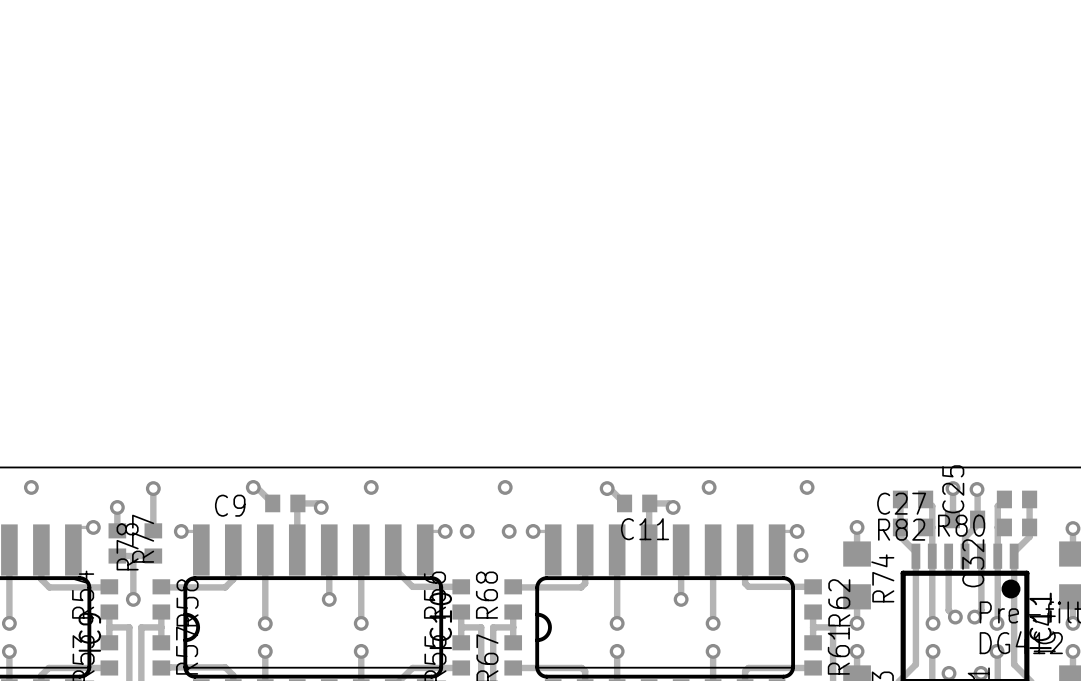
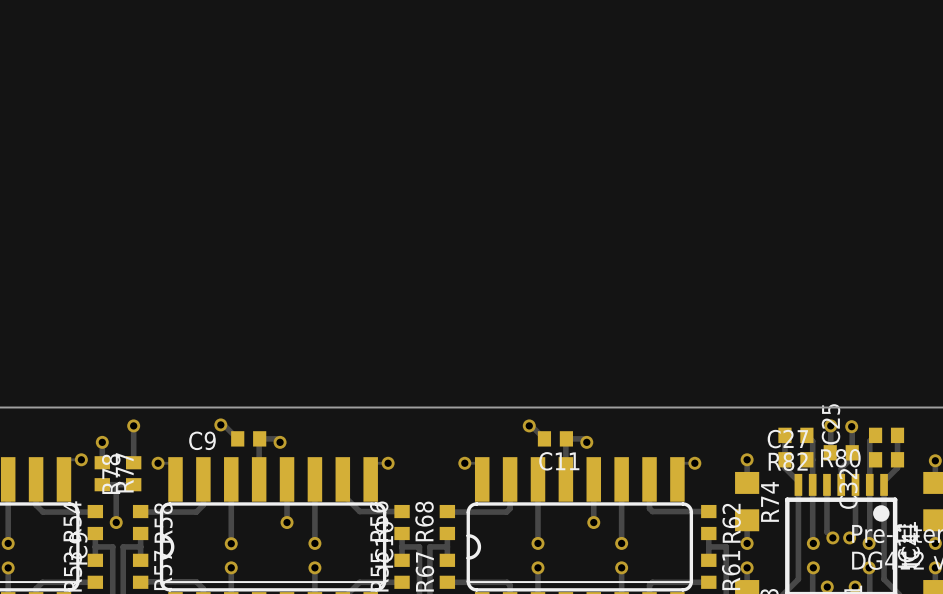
via: (31, 487) -> none
via: (371, 487) -> none
via: (505, 487) -> none
via: (709, 487) -> none
via: (807, 487) -> none
via: (467, 531) -> none
via: (509, 531) -> none
via: (801, 555) -> none

